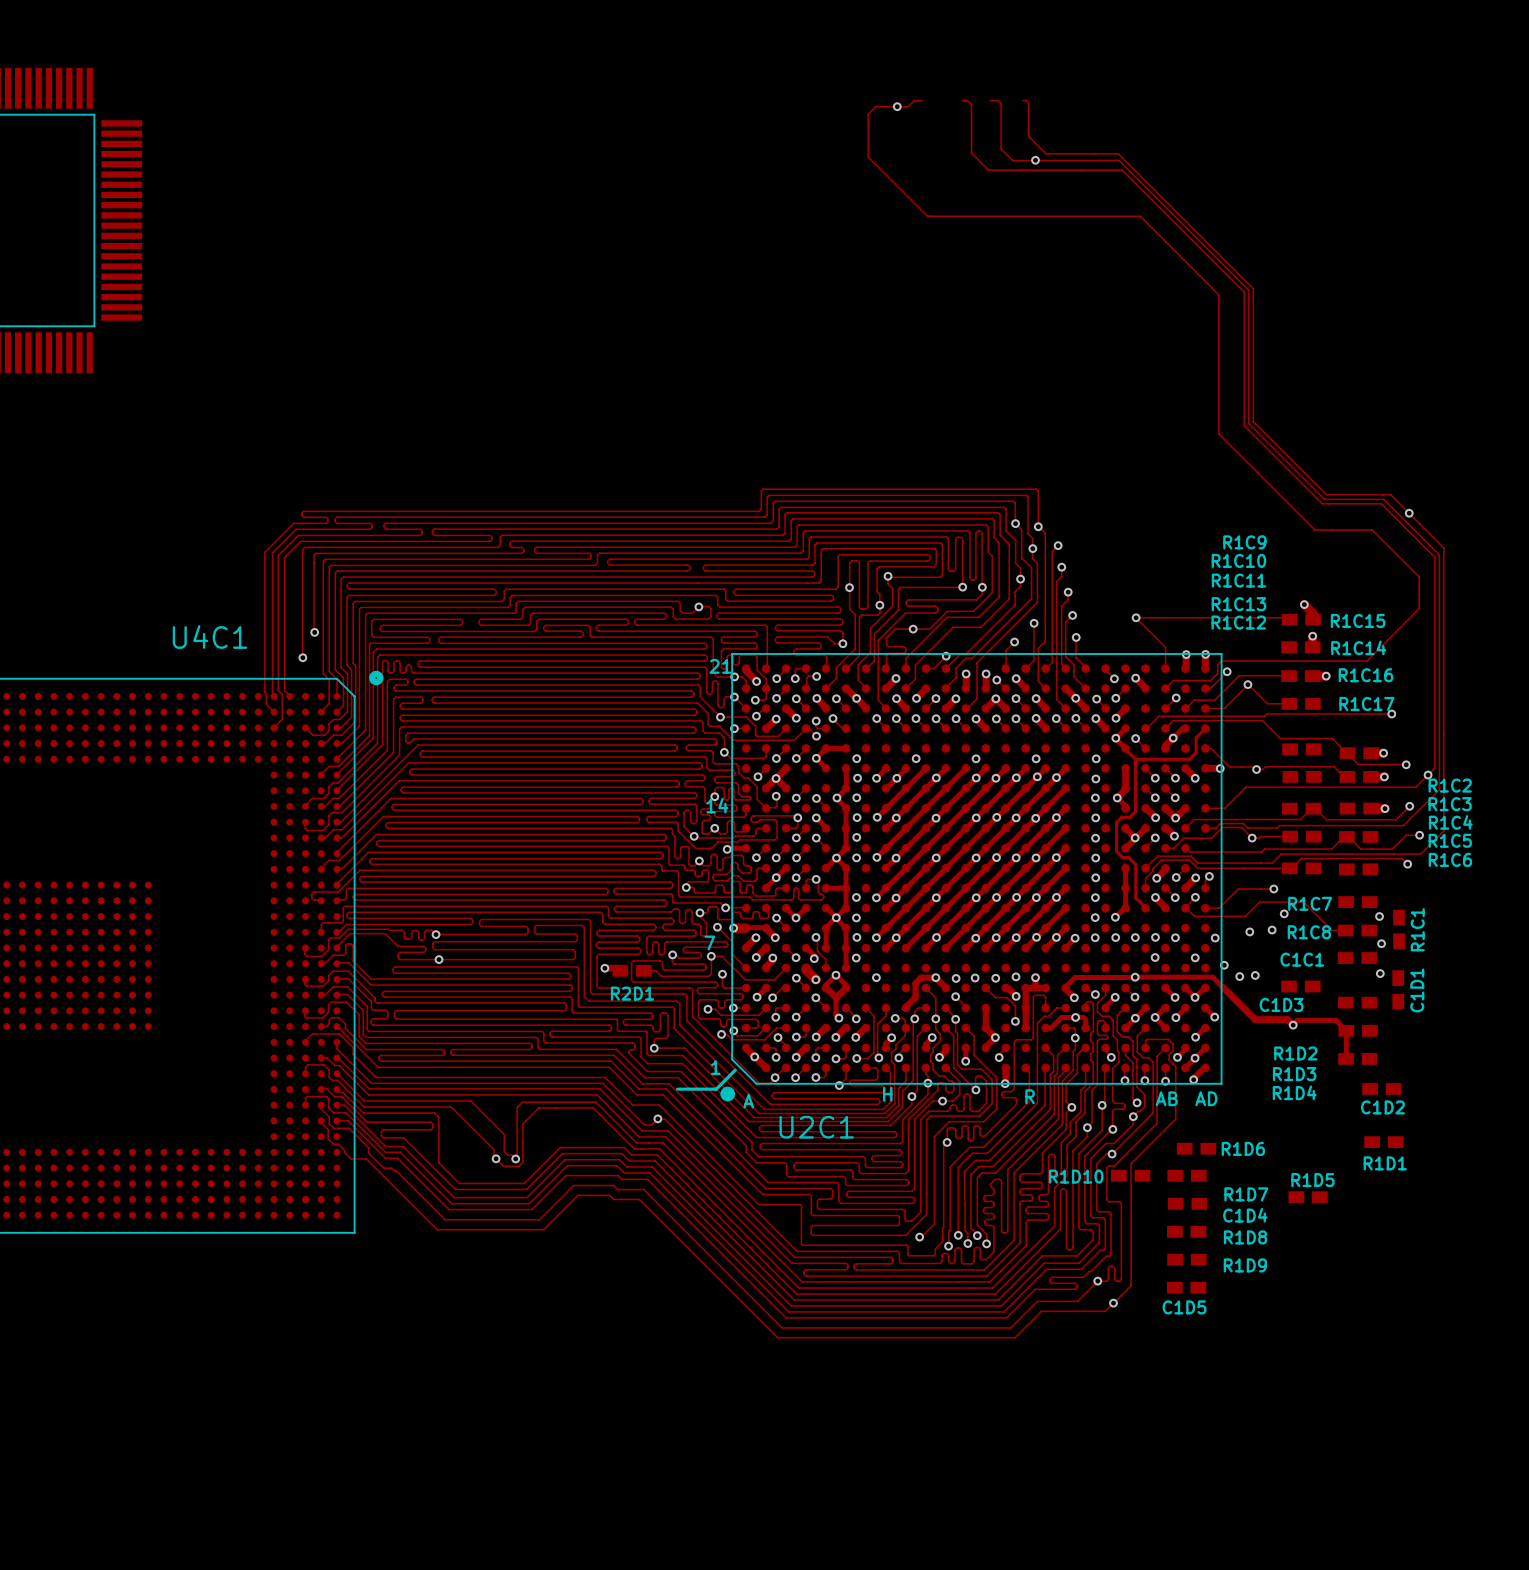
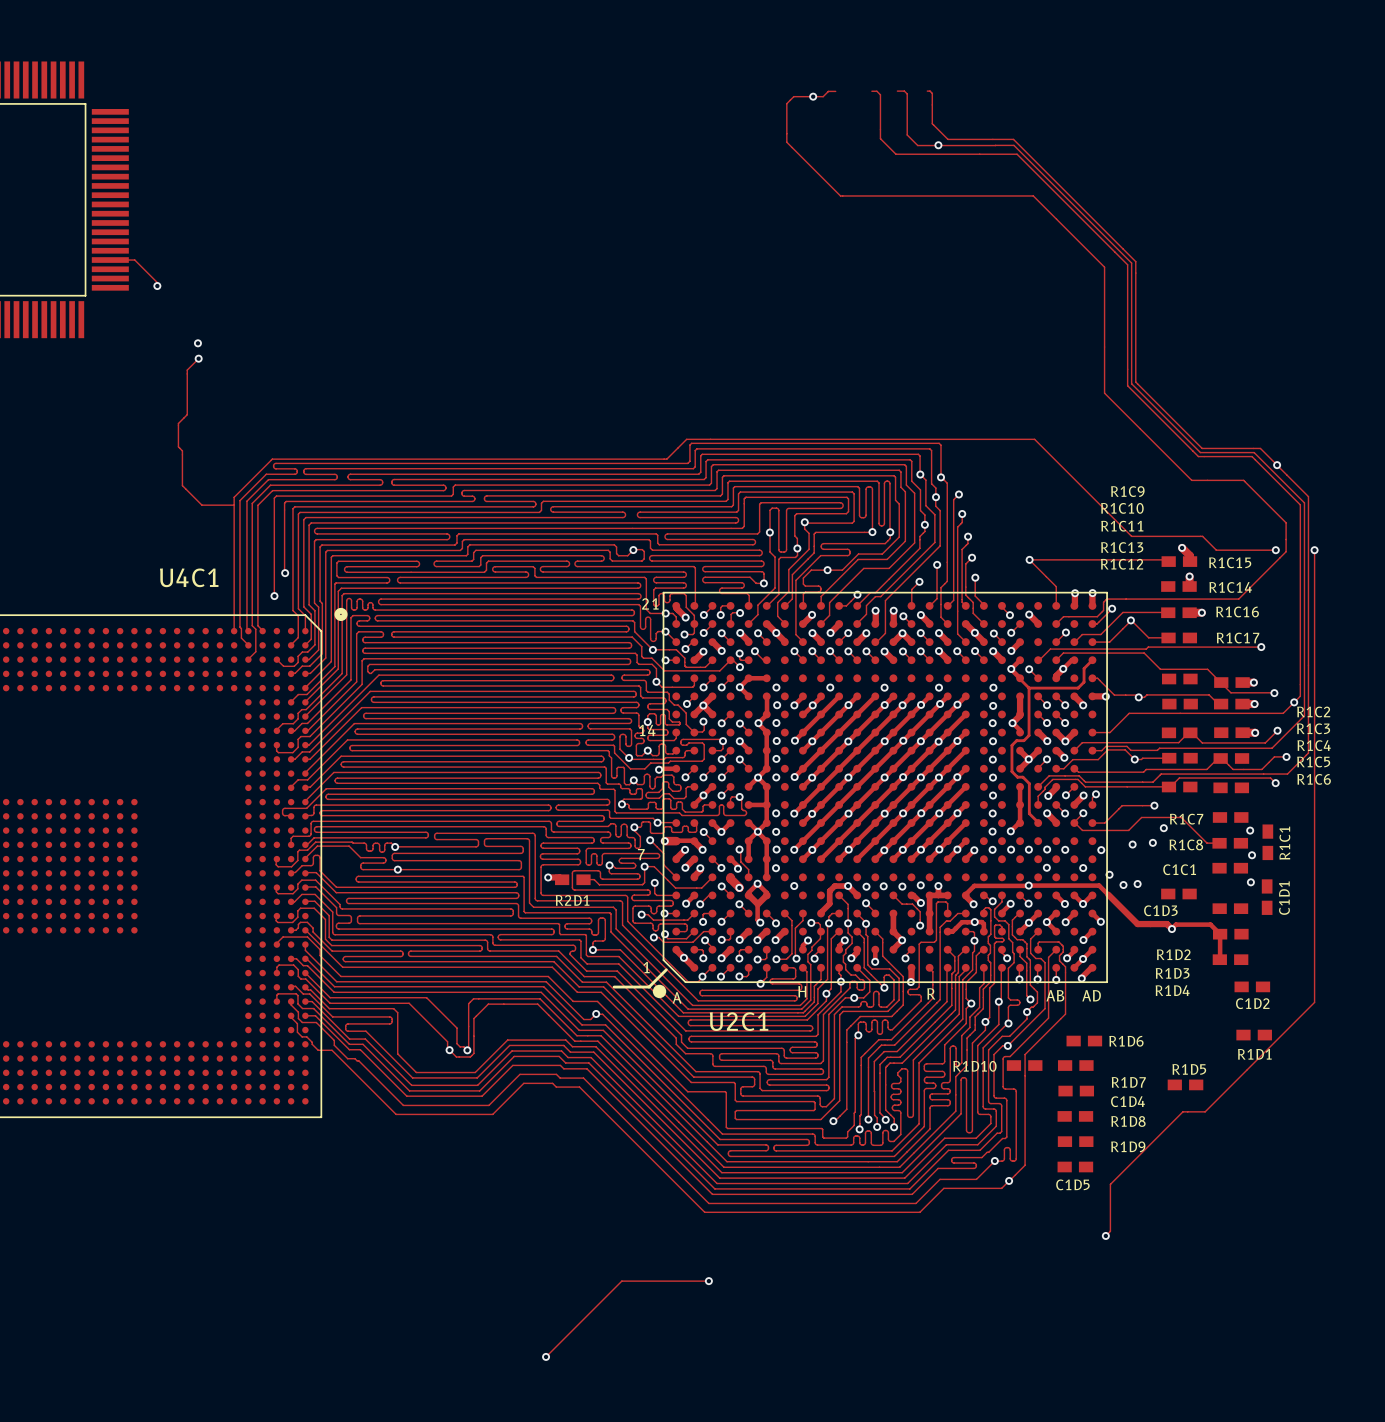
track: none -> (110, 260) (134, 260) (157, 282) (157, 286)
via: none -> (157, 286)
via: none -> (197, 343)
track: none -> (198, 358) (187, 370) (187, 414) (178, 423) (178, 446) (182, 450) (182, 485) (201, 505) (234, 505)
via: none -> (198, 358)
track: none -> (1275, 550) (1216, 550) (1202, 536) (1131, 536) (1034, 439) (686, 439) (666, 459) (272, 459) (234, 497) (234, 631)
via: none -> (1275, 550)
track: none -> (1314, 550) (1314, 1002) (1205, 1111) (1182, 1111) (1110, 1184) (1110, 1231) (1105, 1235)
via: none -> (1314, 550)
via: none -> (1105, 1235)
track: none -> (708, 1281) (621, 1281) (546, 1356)
via: none -> (708, 1281)
via: none -> (546, 1356)

